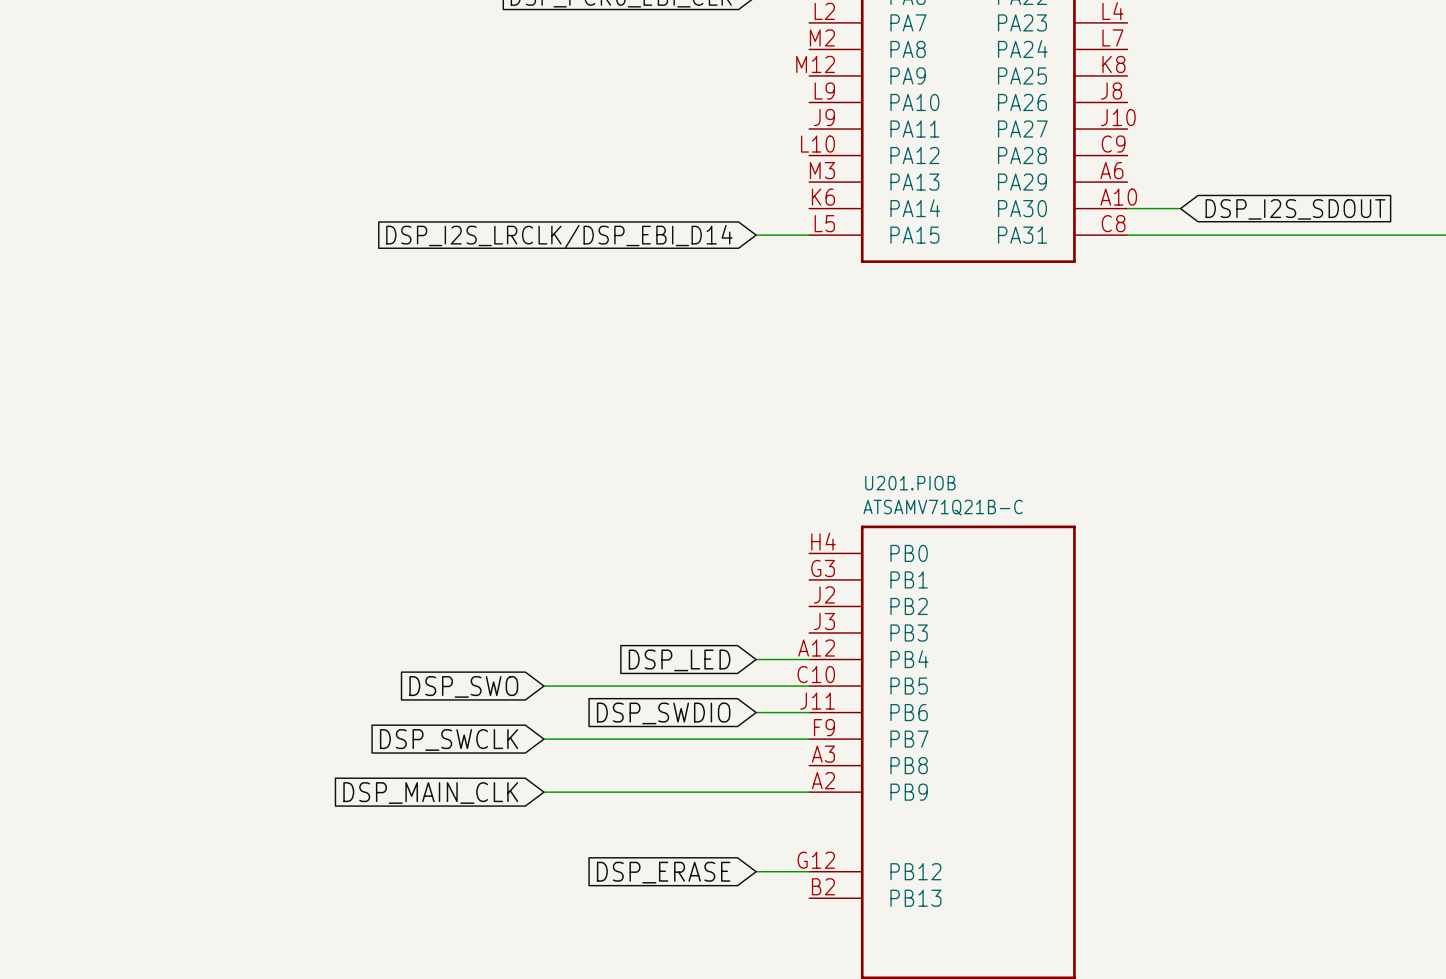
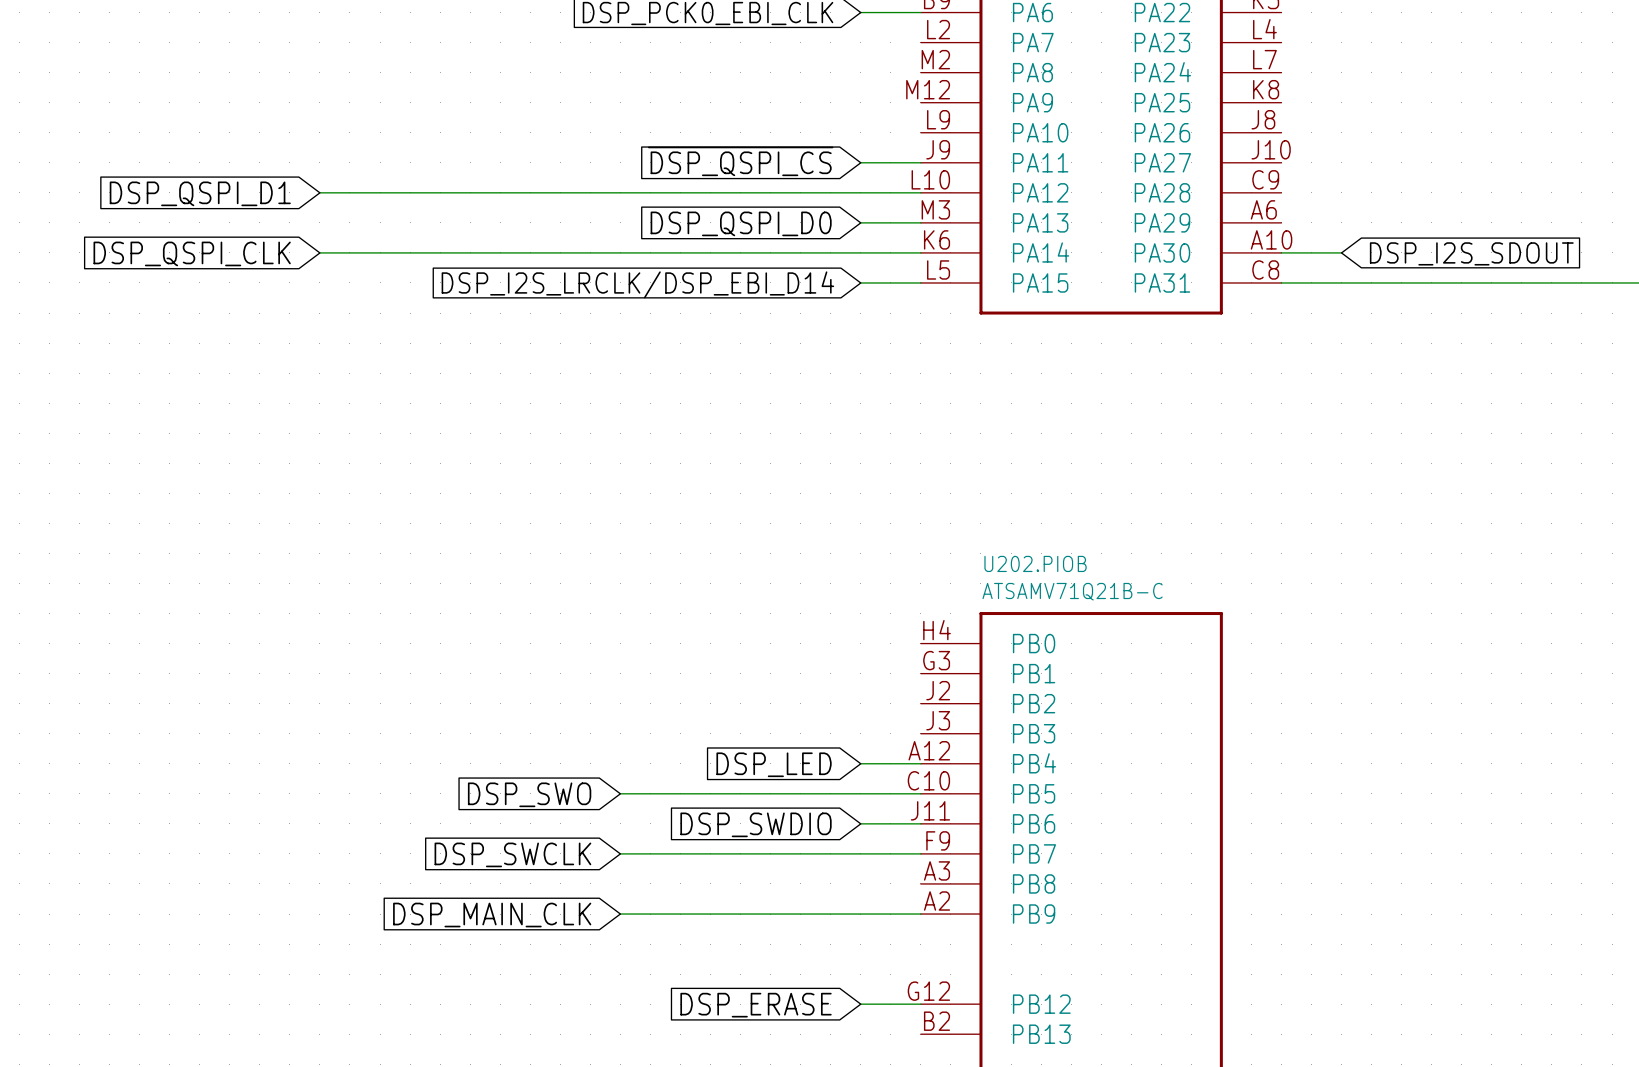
global label: none -> ~{DSP_QSPI_CS} (740, 161)
wire: none -> (860, 162) (920, 162)
wire: none -> (319, 192) (920, 192)
global label: none -> DSP_QSPI_D1 (200, 193)
global label: none -> DSP_QSPI_D0 (741, 223)
wire: none -> (860, 222) (920, 222)
wire: none -> (319, 252) (920, 252)
global label: none -> DSP_QSPI_CLK (192, 253)
U201.PIOB name: U201.PIOB (910, 483) -> U202.PIOB (1035, 563)

